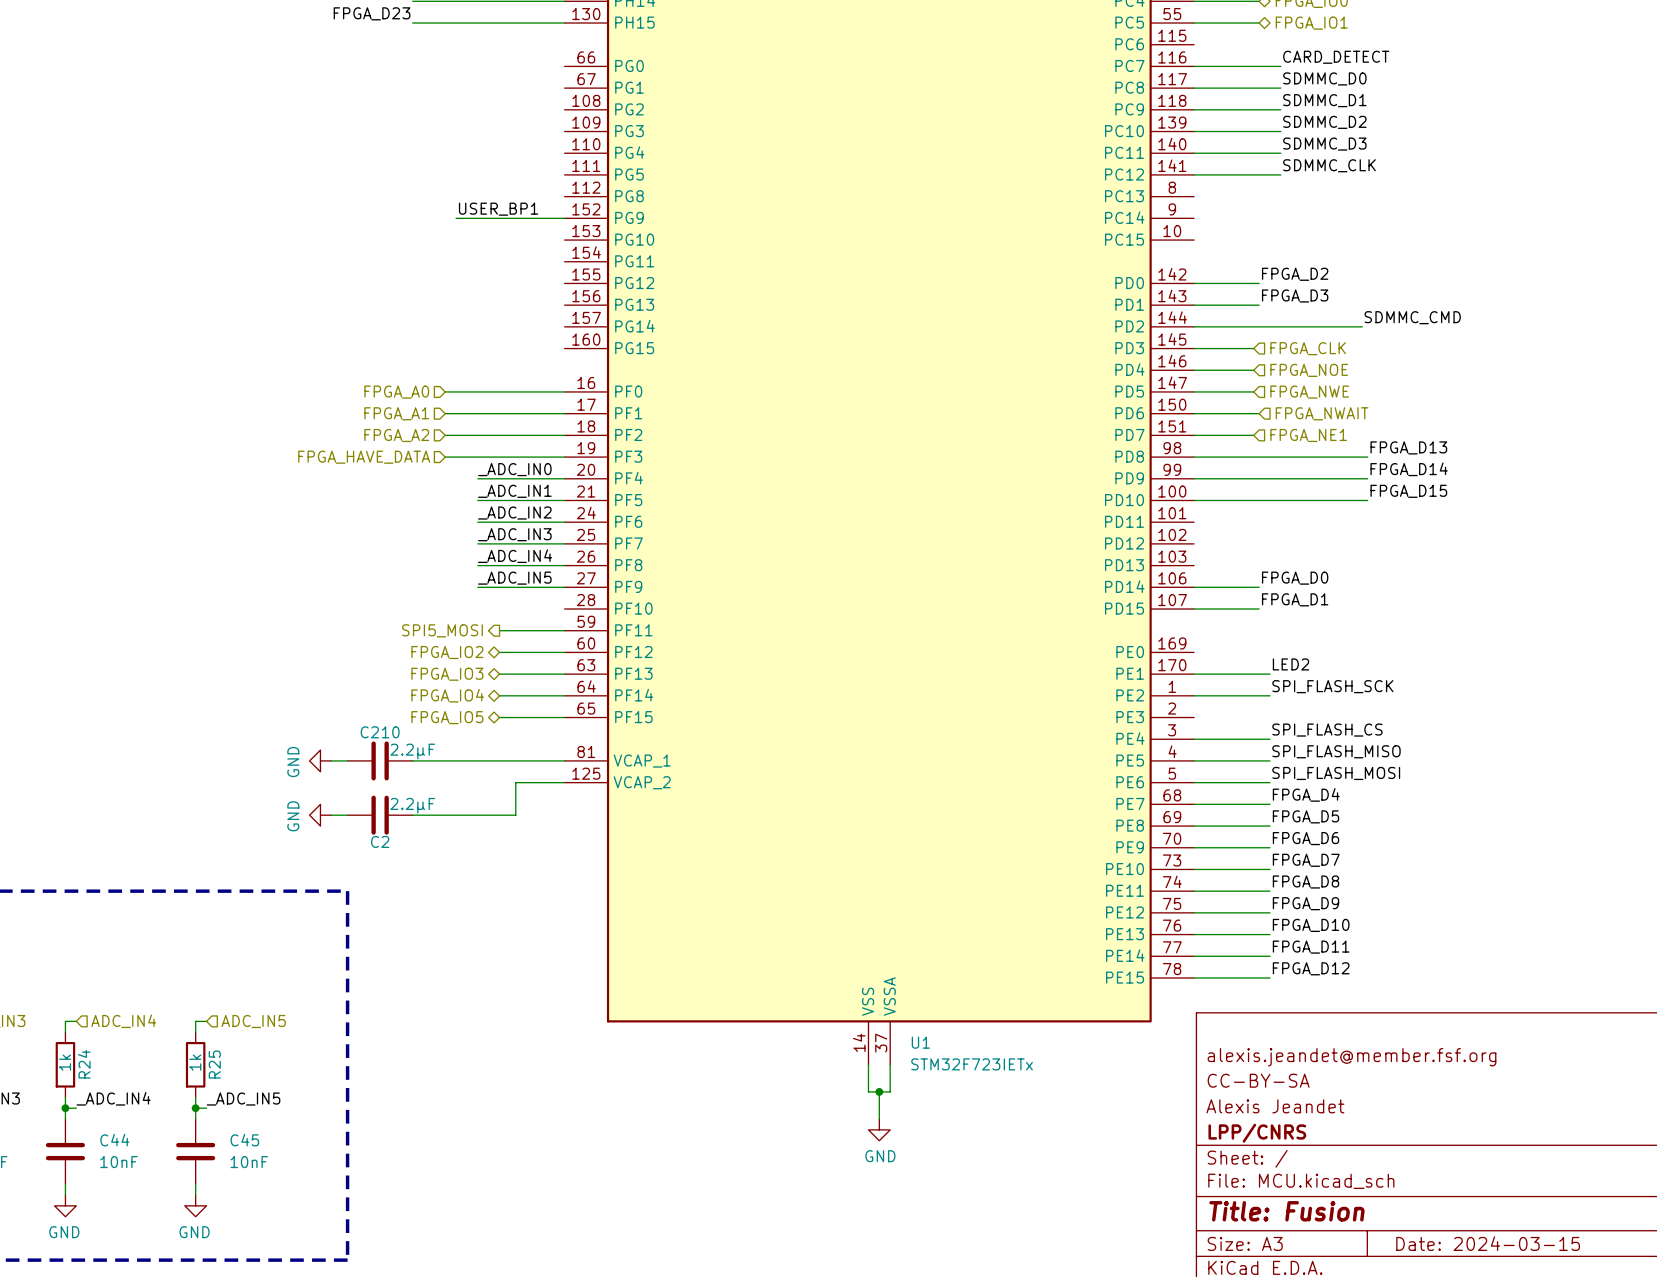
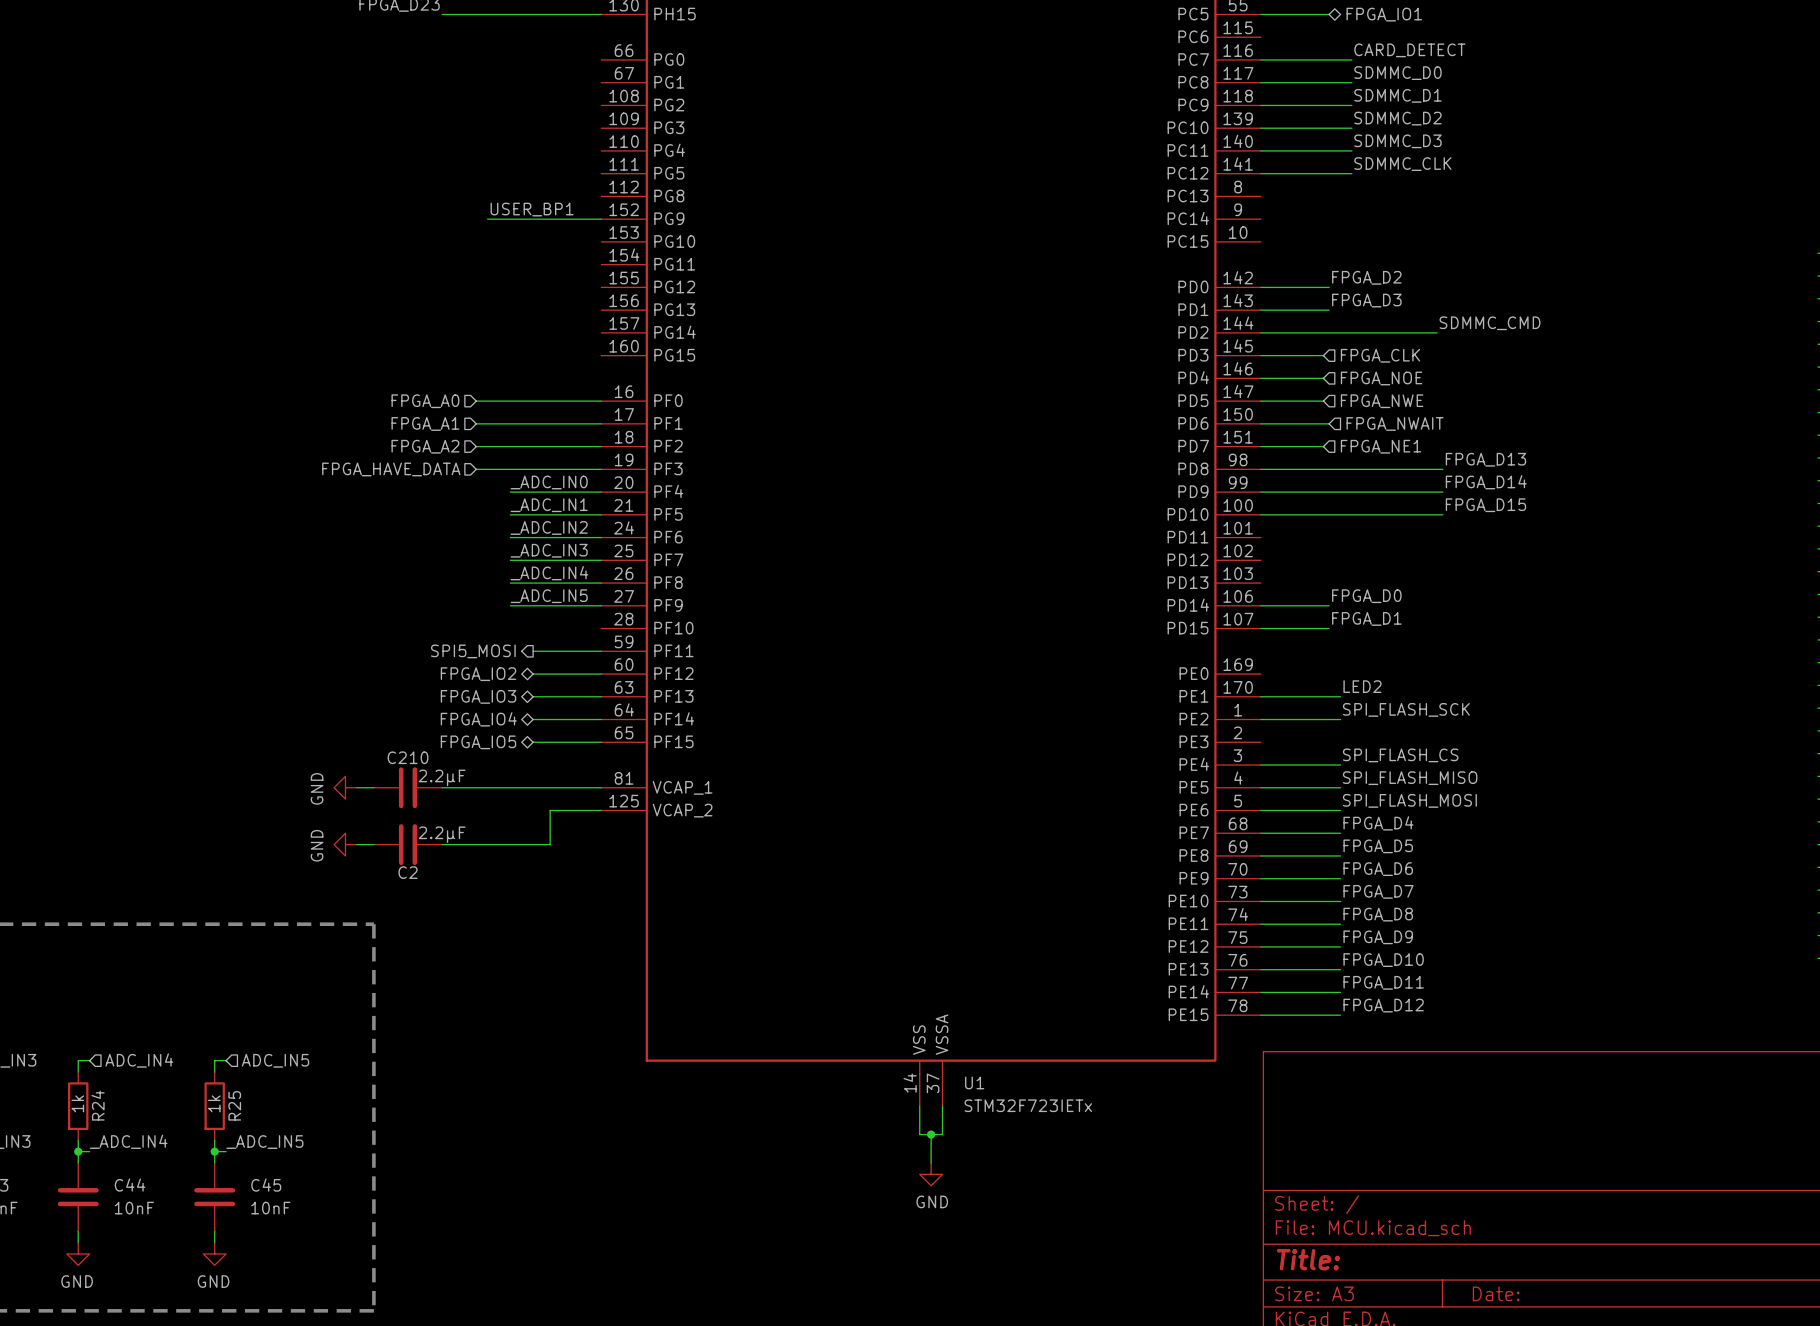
title block: alexis.jeandet@member.fsf.org (1352, 1057) -> none
title block: CC-BY-SA (1258, 1080) -> none
title block: Alexis Jeandet (1275, 1106) -> none
title block: LPP/CNRS (1257, 1133) -> none
title block: Title: Fusion (1286, 1211) -> Title: (1308, 1259)
title block: Date: 2024-03-15 (1488, 1243) -> Date: (1496, 1293)

